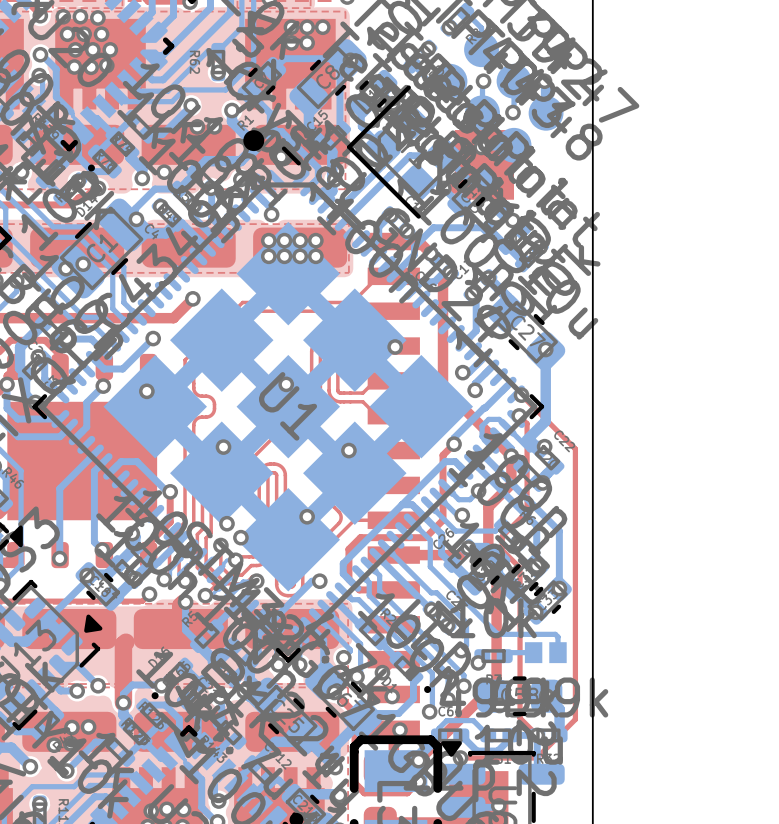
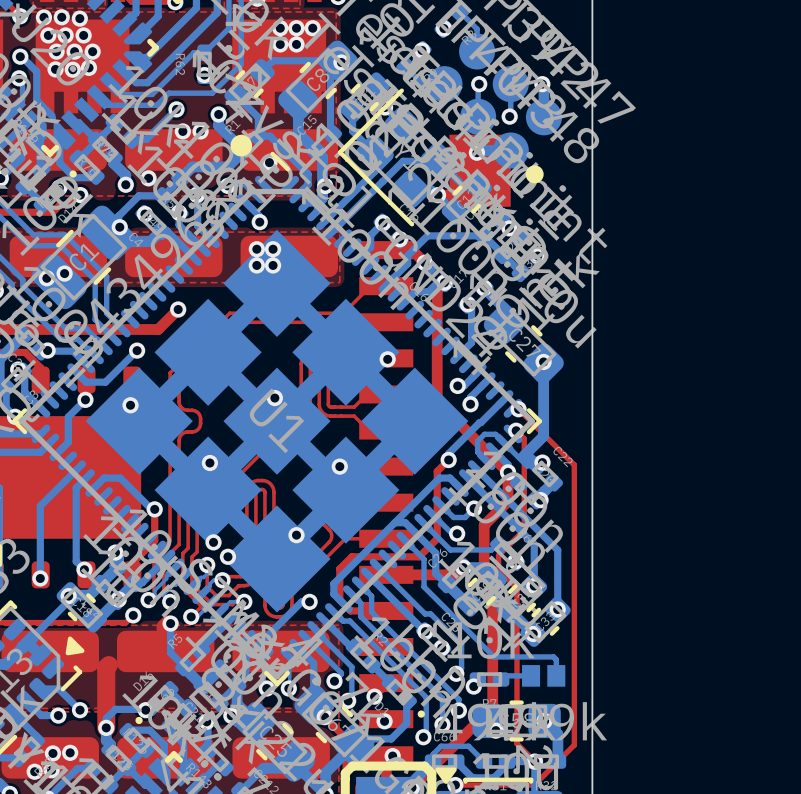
drawing: none -> [525, 165, 544, 184]
via: (300, 240) -> none
via: (315, 240) -> none
via: (300, 256) -> none
via: (315, 256) -> none

